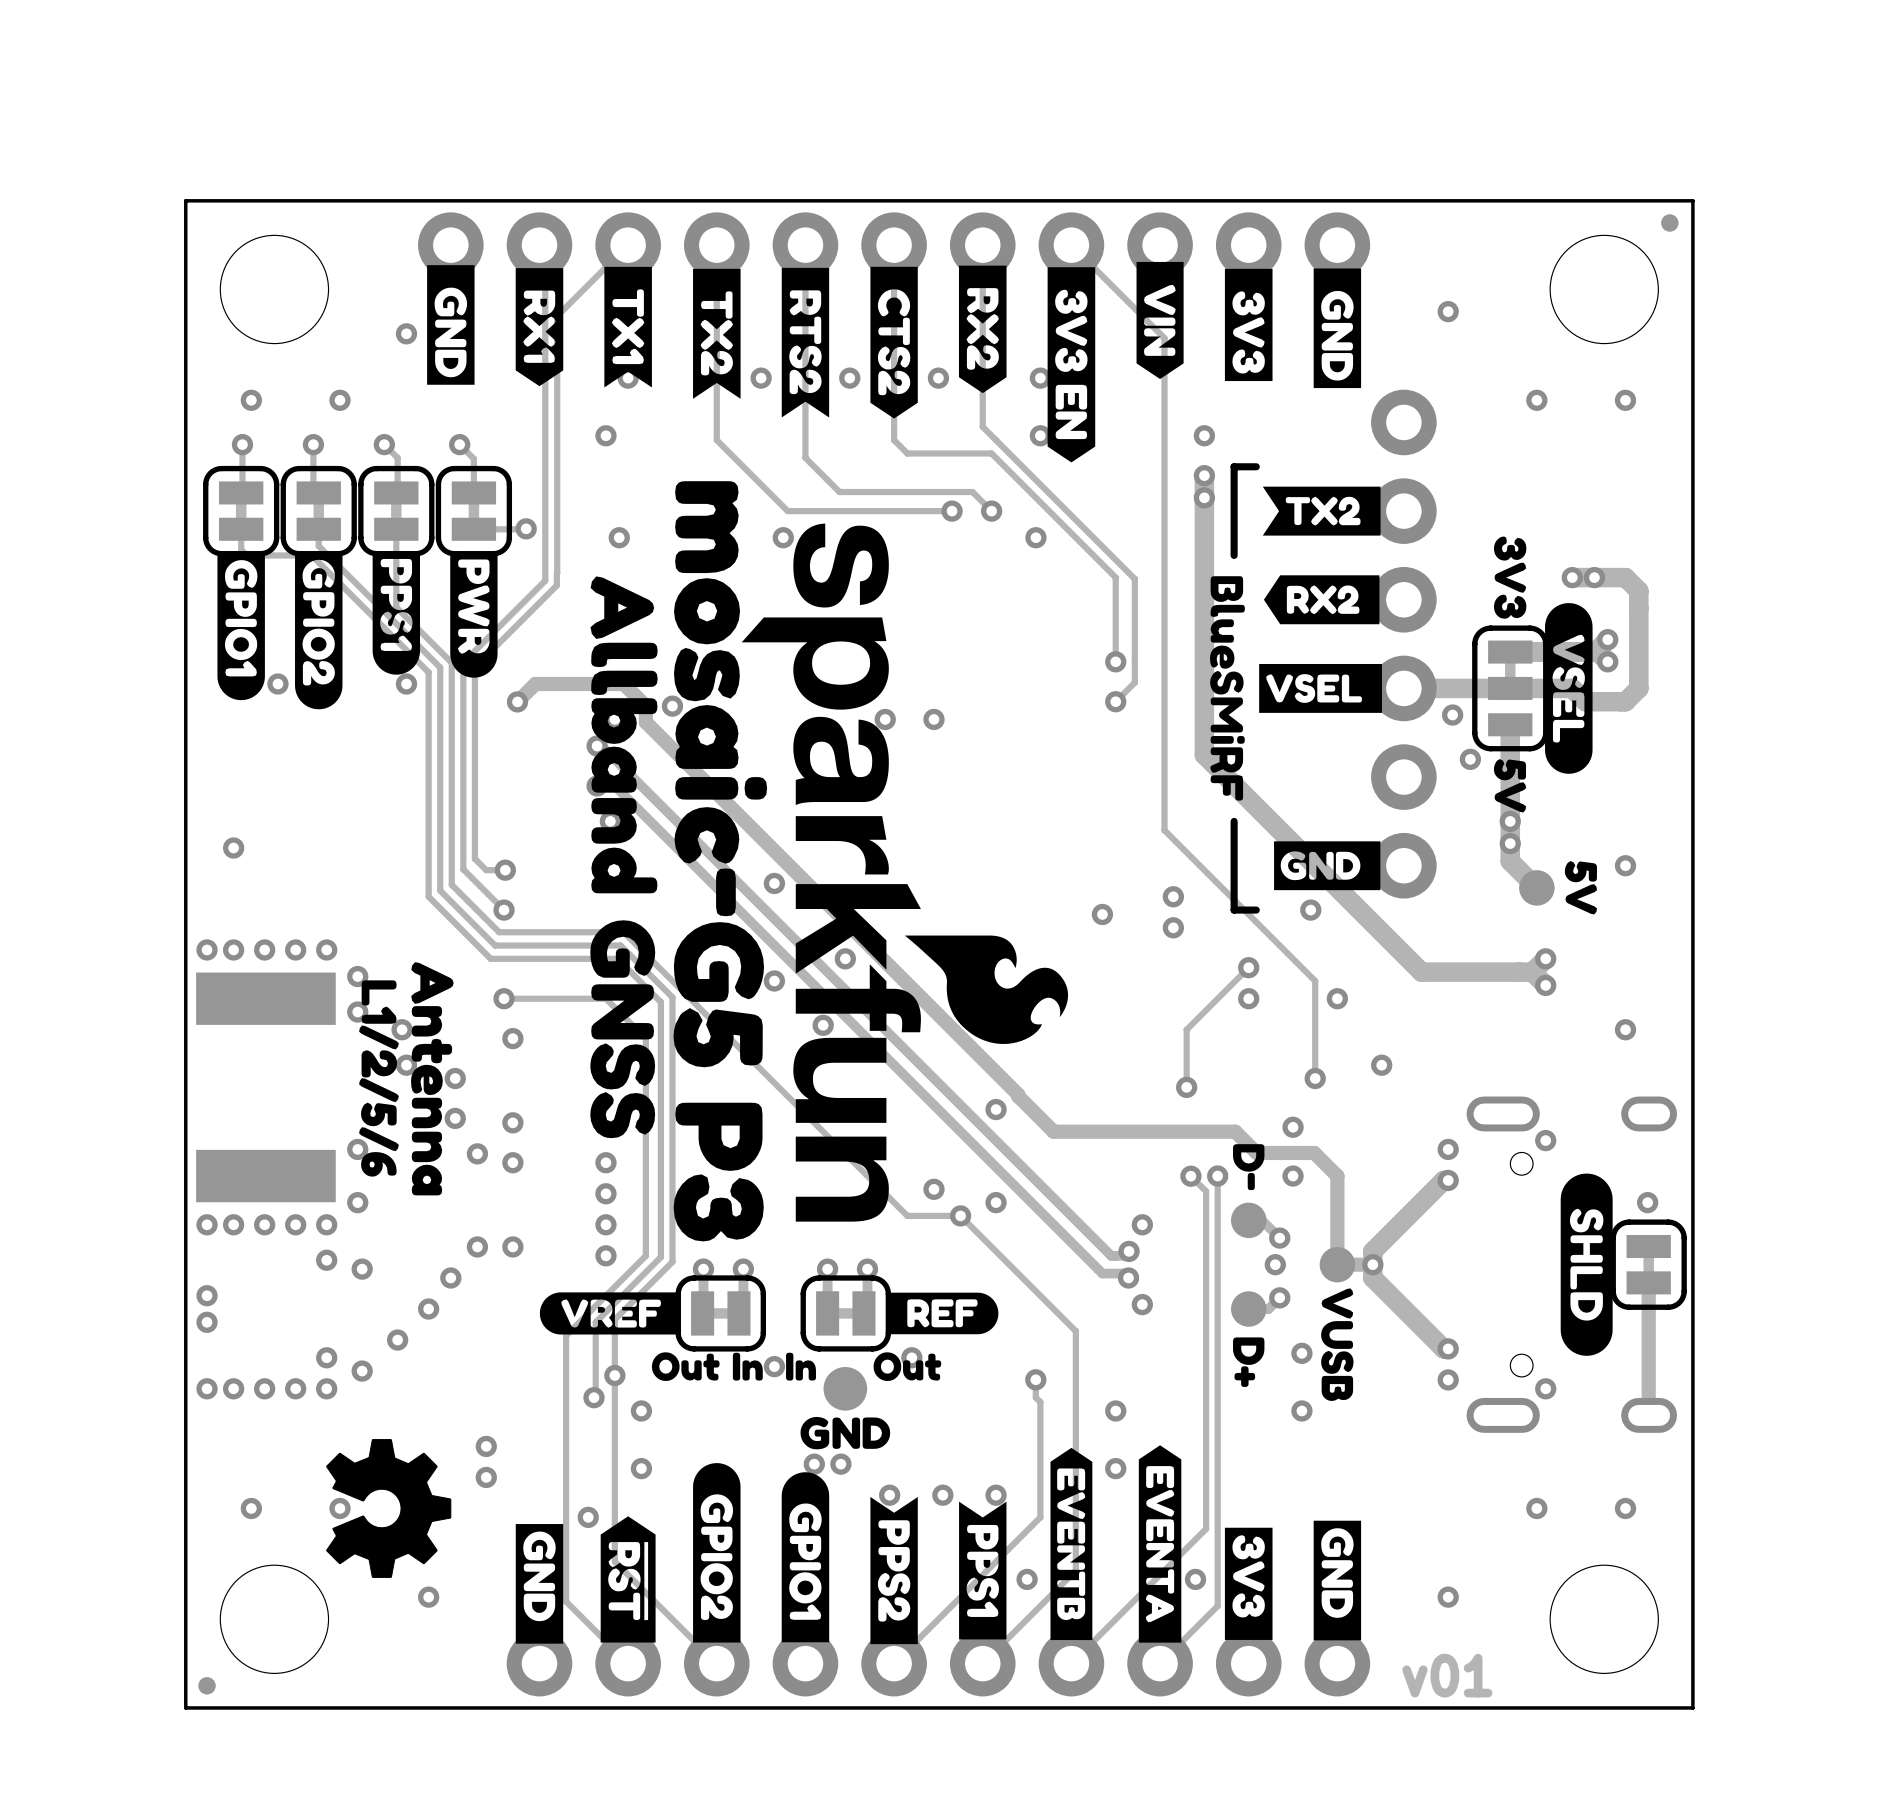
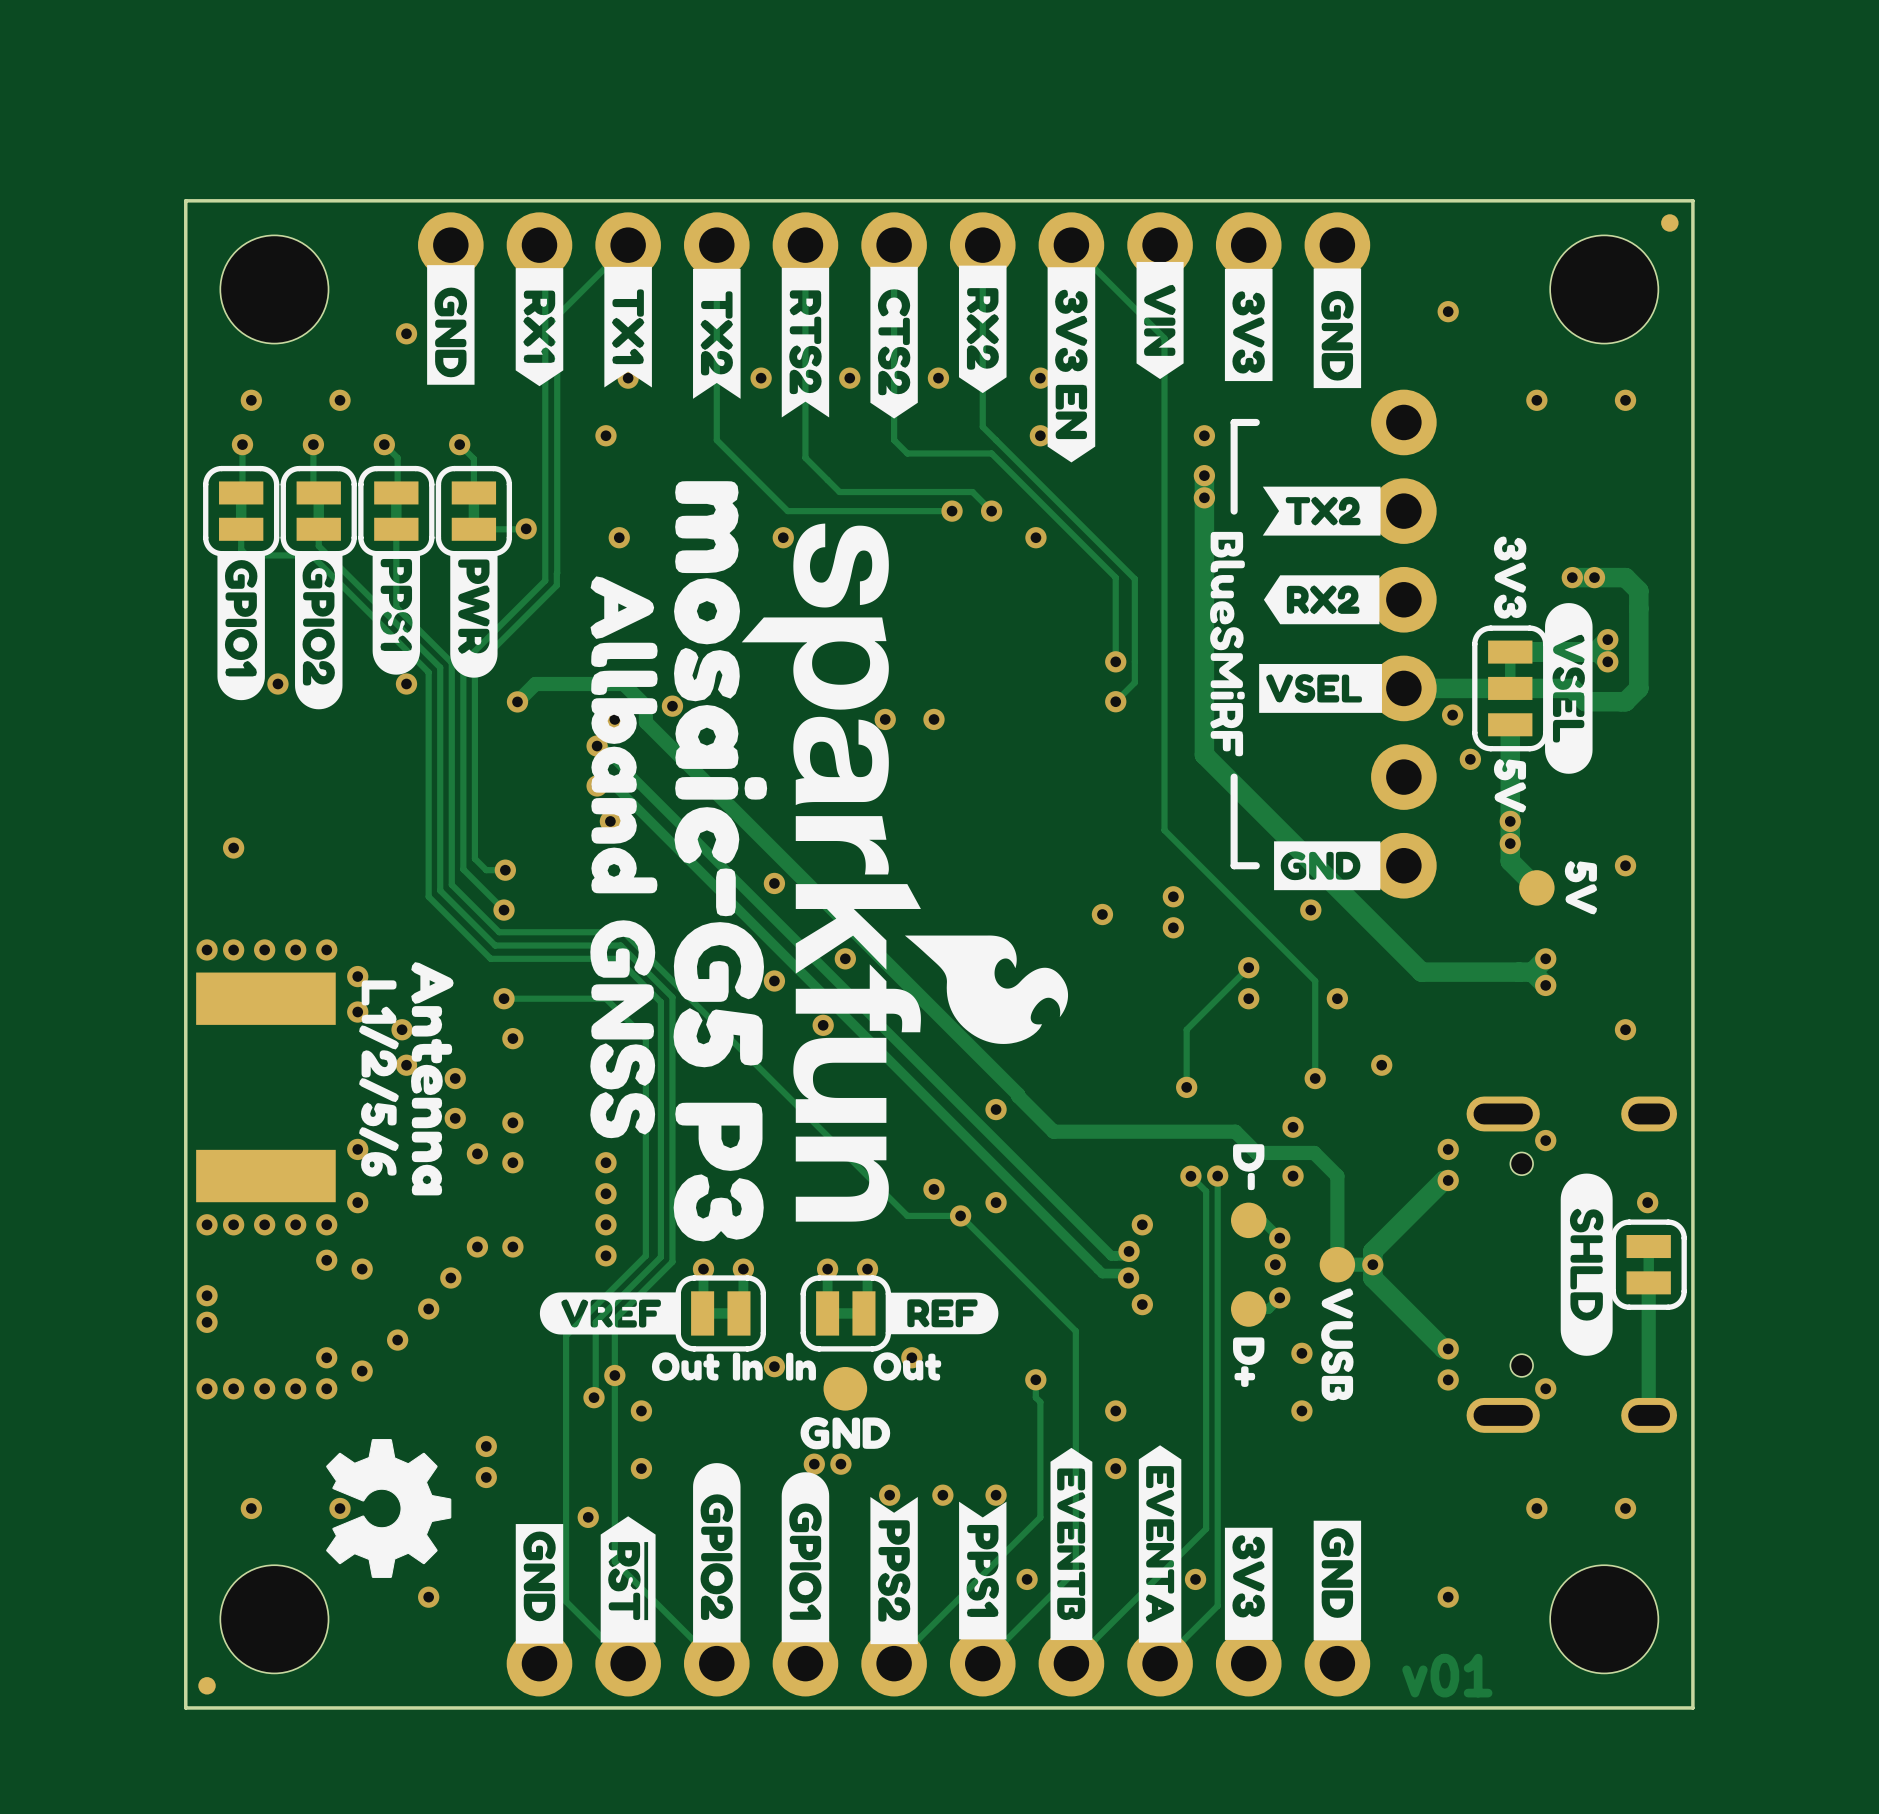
line: (1256, 466) (1234, 466) -> (1256, 422) (1234, 422) (1234, 466)
line: (1234, 511) (1234, 555) -> (1234, 777) (1234, 821)
drawing position: (1227, 688) -> (1227, 644)
line: (1234, 865) (1234, 910) (1256, 910) -> (1234, 865) (1256, 865)

